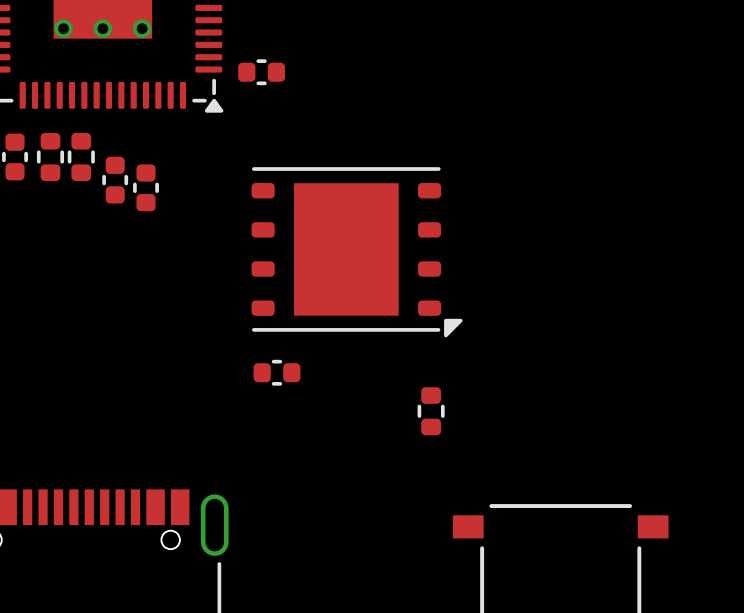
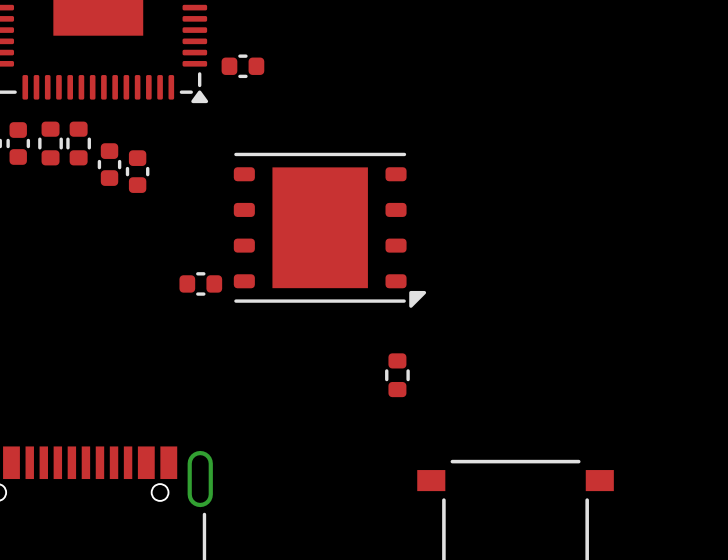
part: (63, 28) -> none
part: (102, 28) -> none
part: (142, 28) -> none
part position: (276, 372) -> (200, 283)

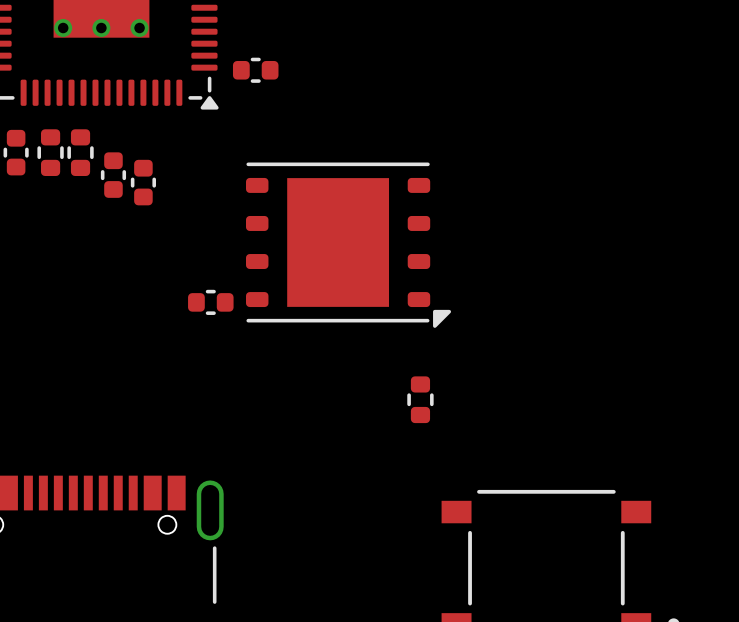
part: none -> (63, 28)
part: none -> (101, 28)
part: none -> (139, 28)

